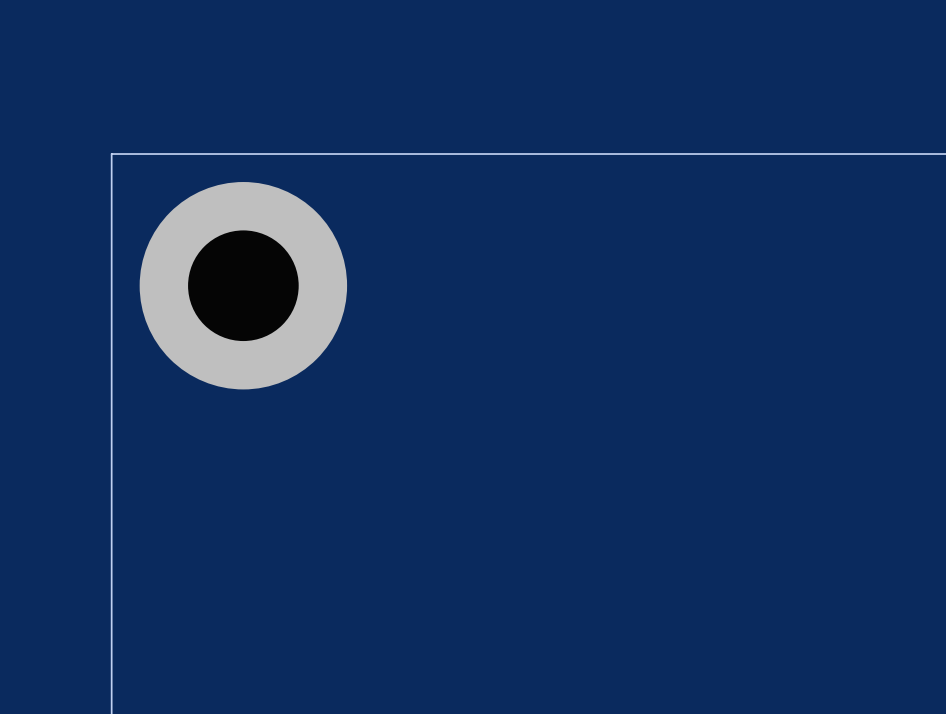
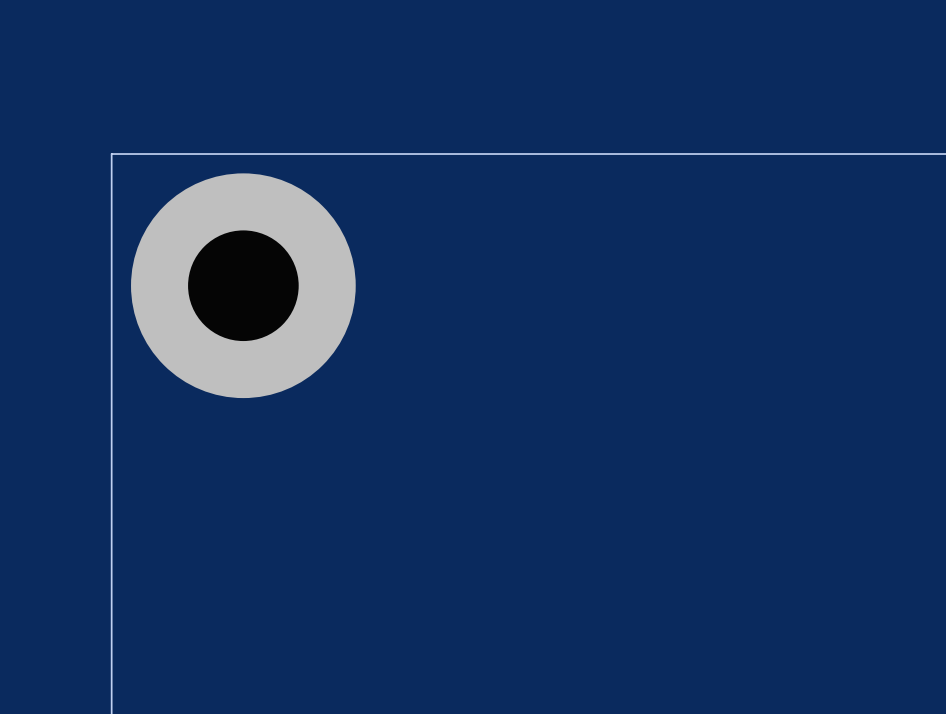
via size: [139, 182, 348, 390] -> [131, 173, 356, 399]

